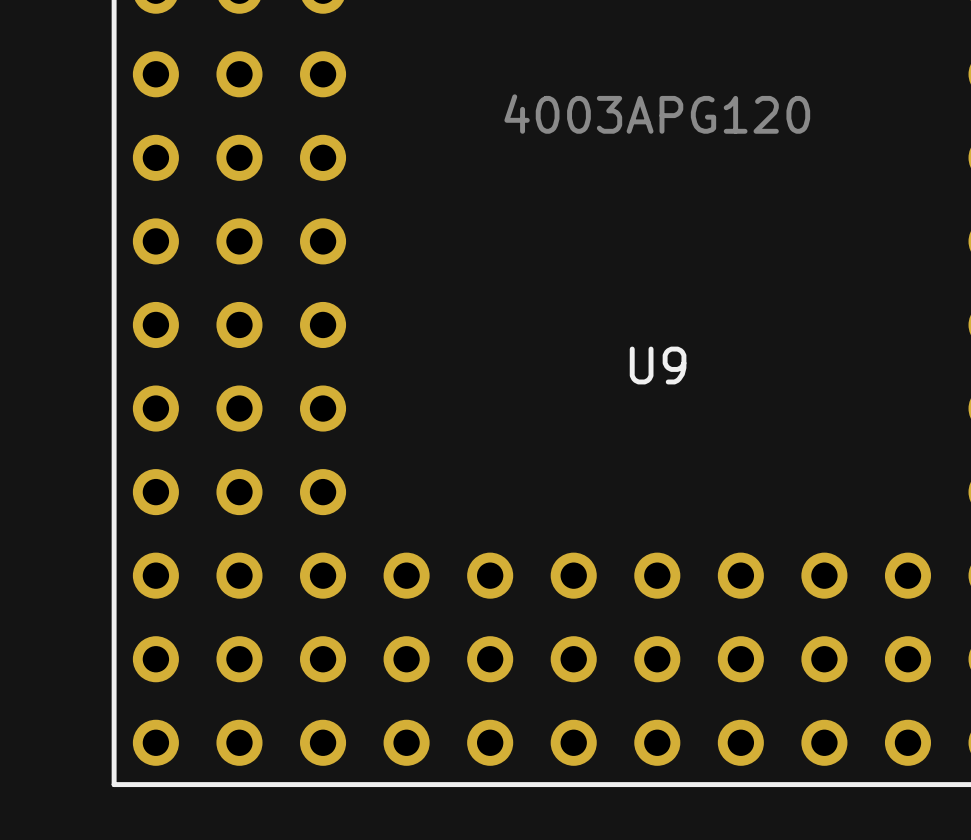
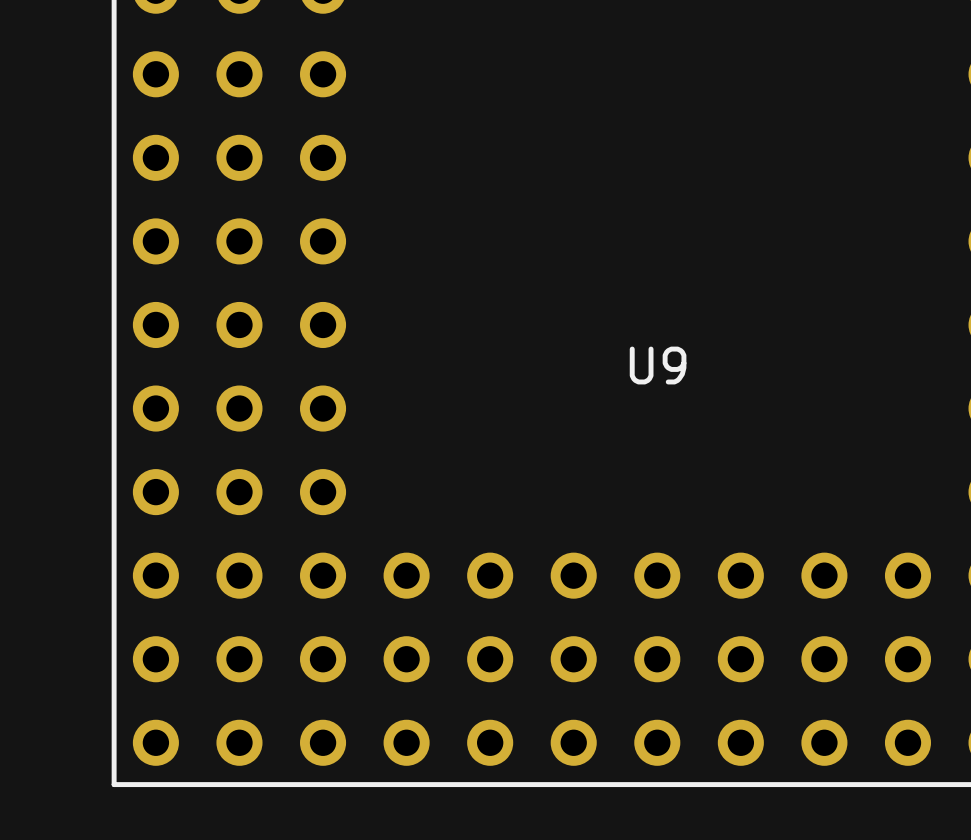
U9 value: 4003APG120 (657, 114) -> none

